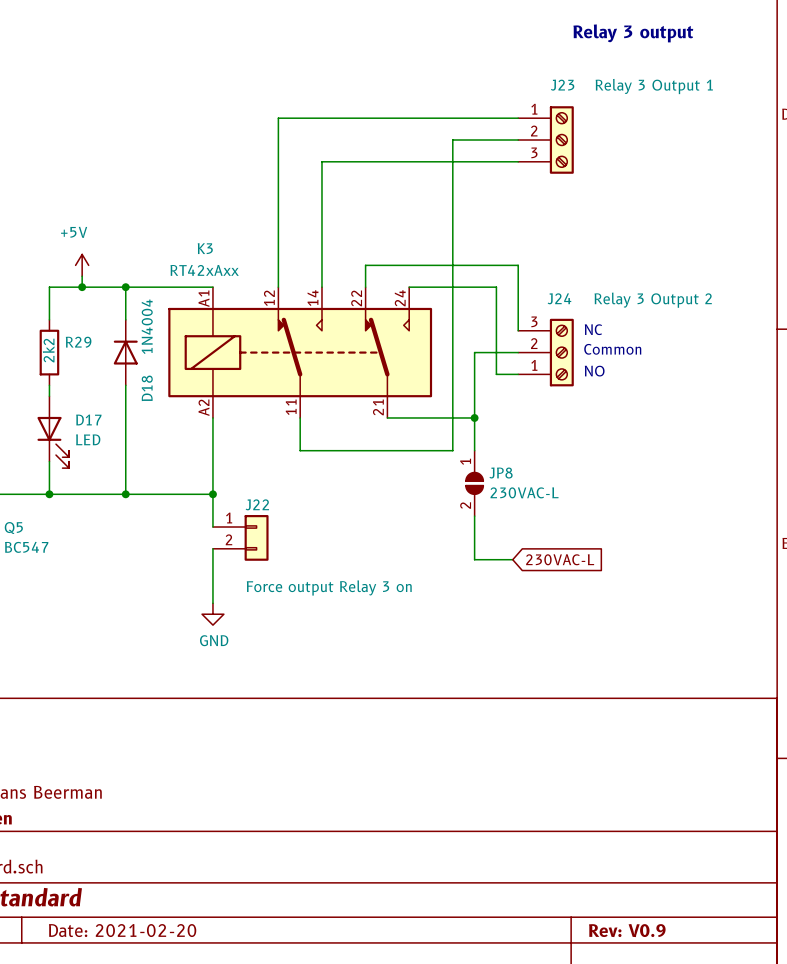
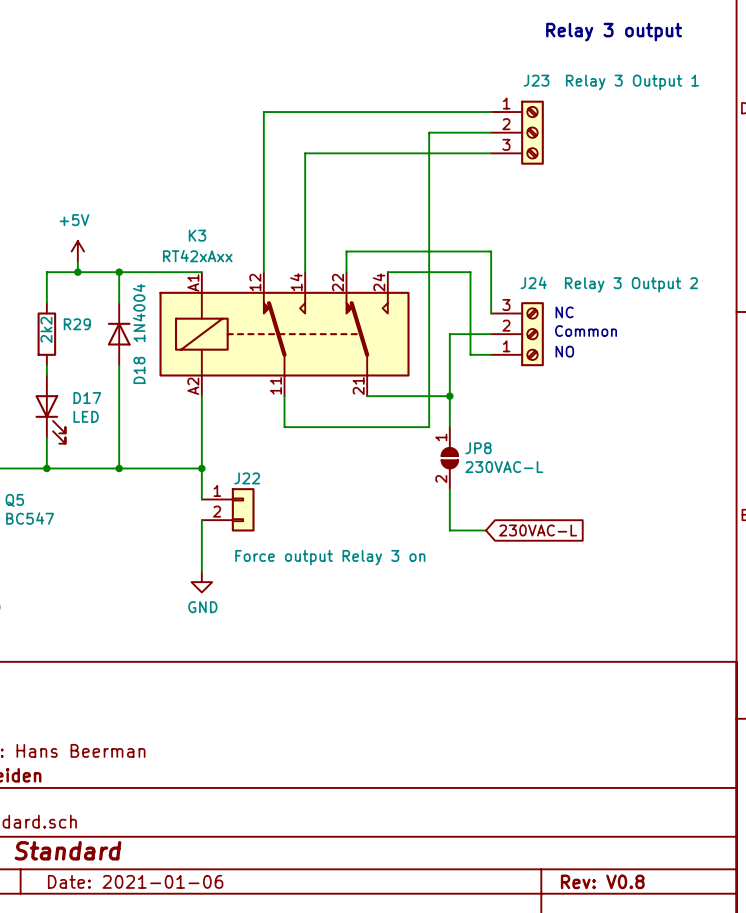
title block: Date: 2021-02-20 (122, 930) -> Date: 2021-01-06 (135, 881)
title block: Rev: V0.9 (627, 930) -> Rev: V0.8 (602, 881)

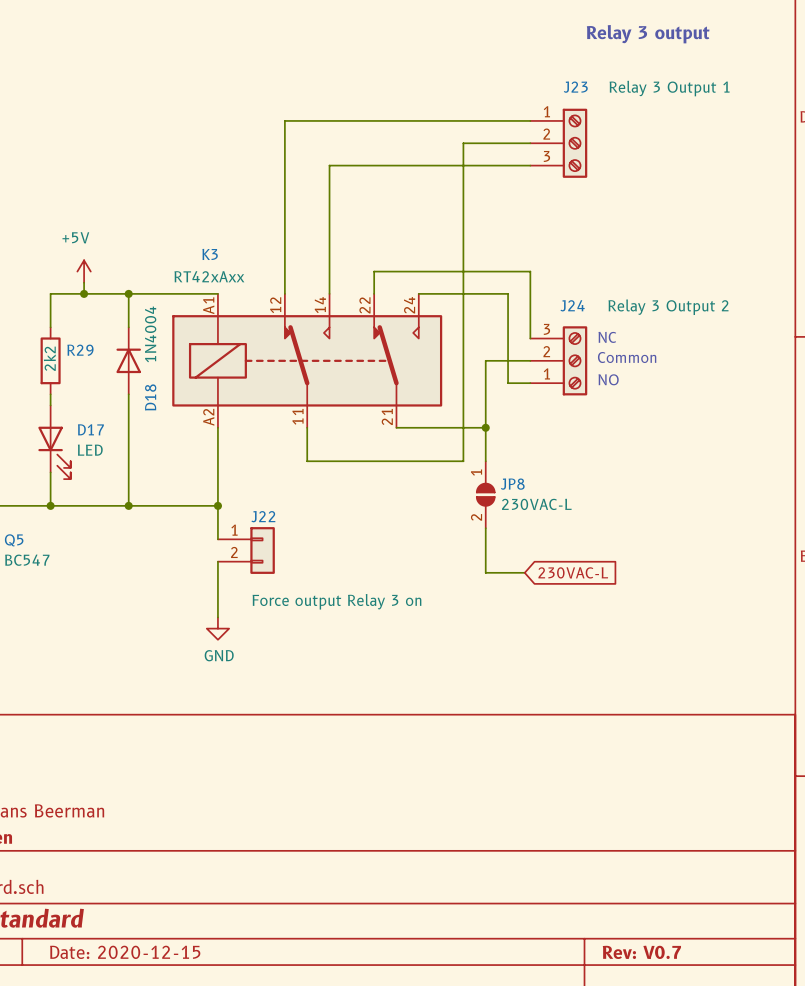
title block: Date: 2021-01-06 (135, 881) -> Date: 2020-12-15 (125, 952)
title block: Rev: V0.8 (602, 881) -> Rev: V0.7 (641, 952)

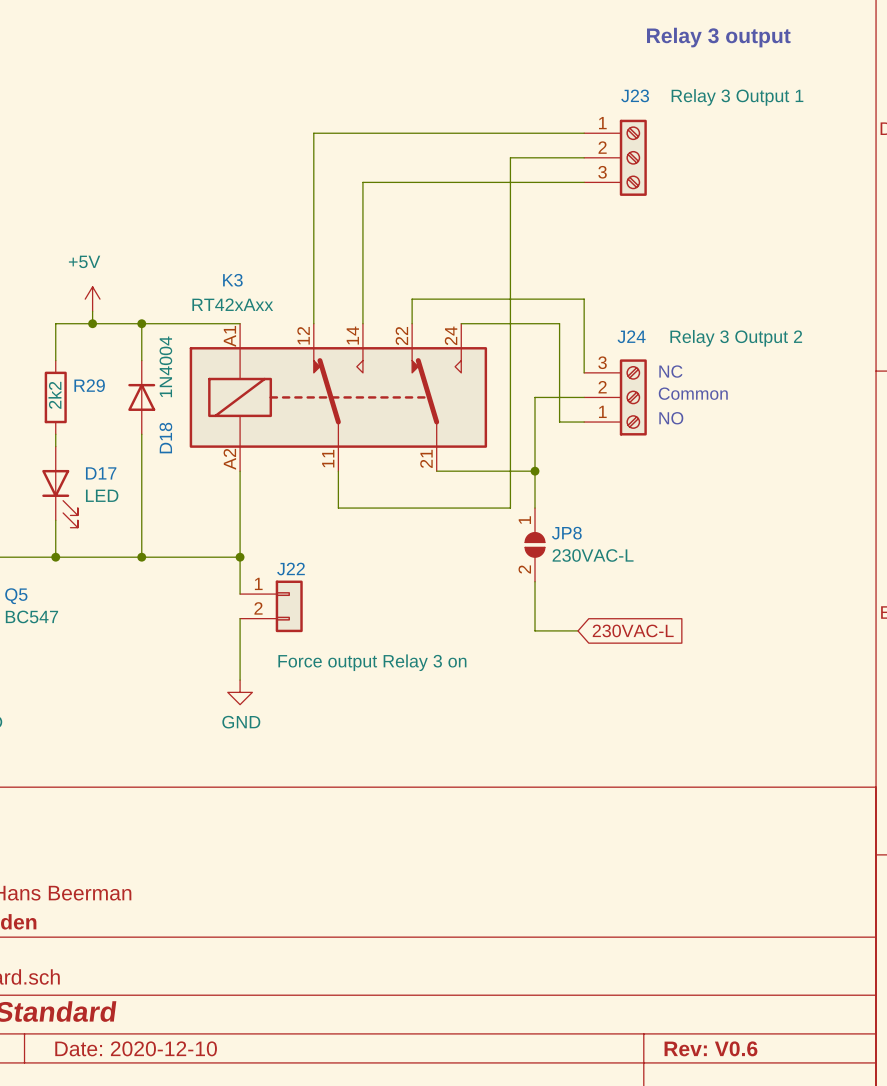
title block: Date: 2020-12-15 (125, 952) -> Date: 2020-12-10 (136, 1048)
title block: Rev: V0.7 (641, 952) -> Rev: V0.6 (710, 1048)

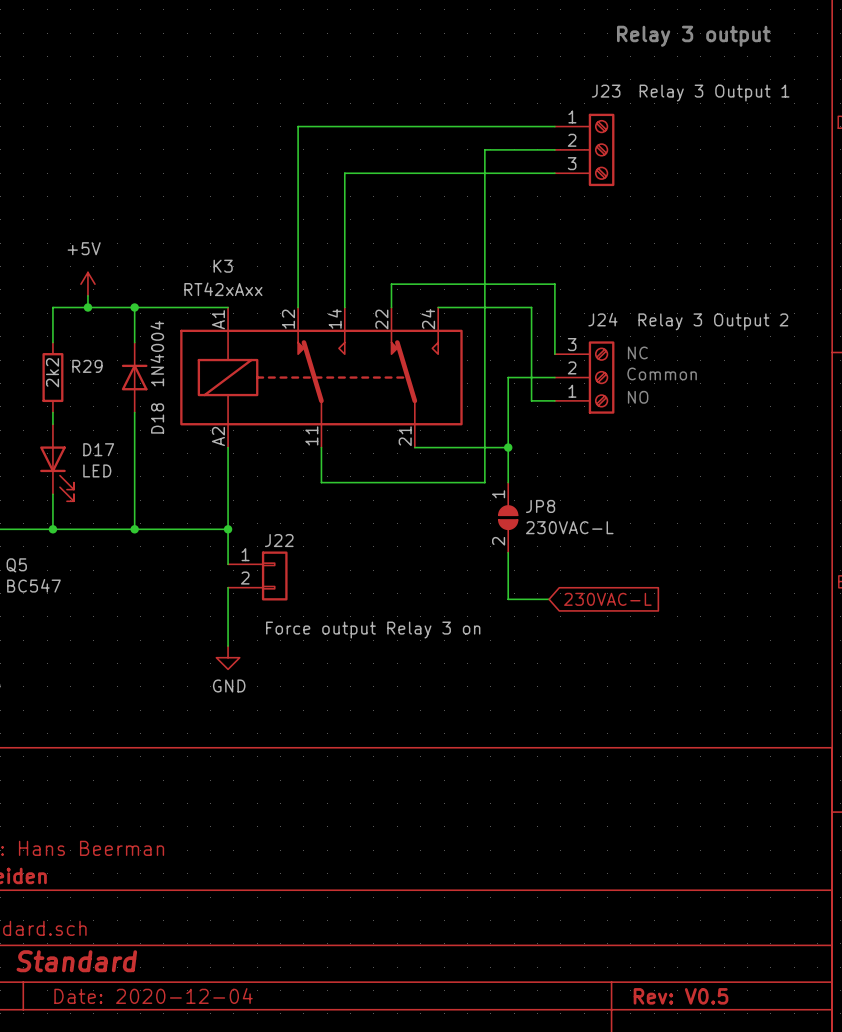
title block: Date: 2020-12-10 (136, 1048) -> Date: 2020-12-04 (153, 996)
title block: Rev: V0.6 (710, 1048) -> Rev: V0.5 (681, 996)

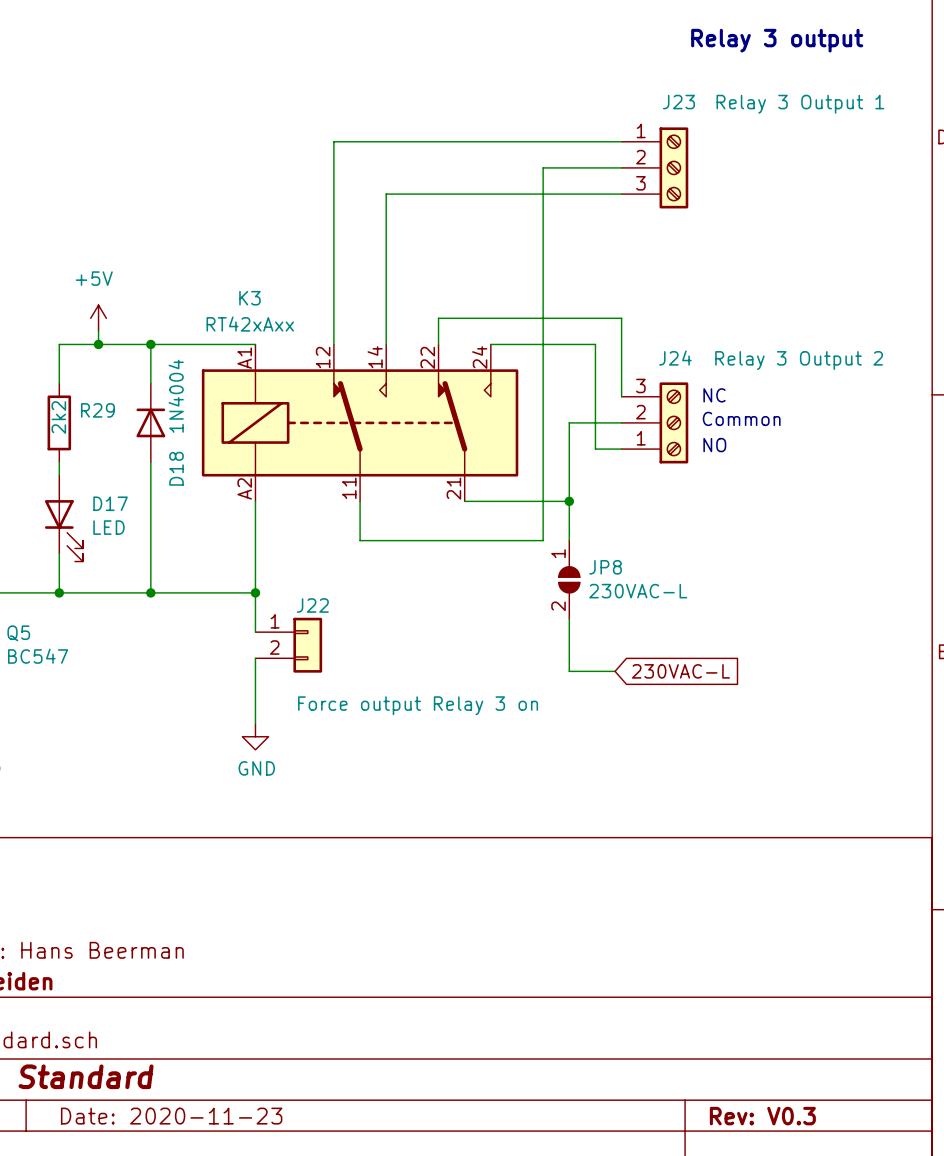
title block: Date: 2020-12-04 (153, 996) -> Date: 2020-11-23 (171, 1116)
title block: Rev: V0.5 (681, 996) -> Rev: V0.3 (762, 1116)

